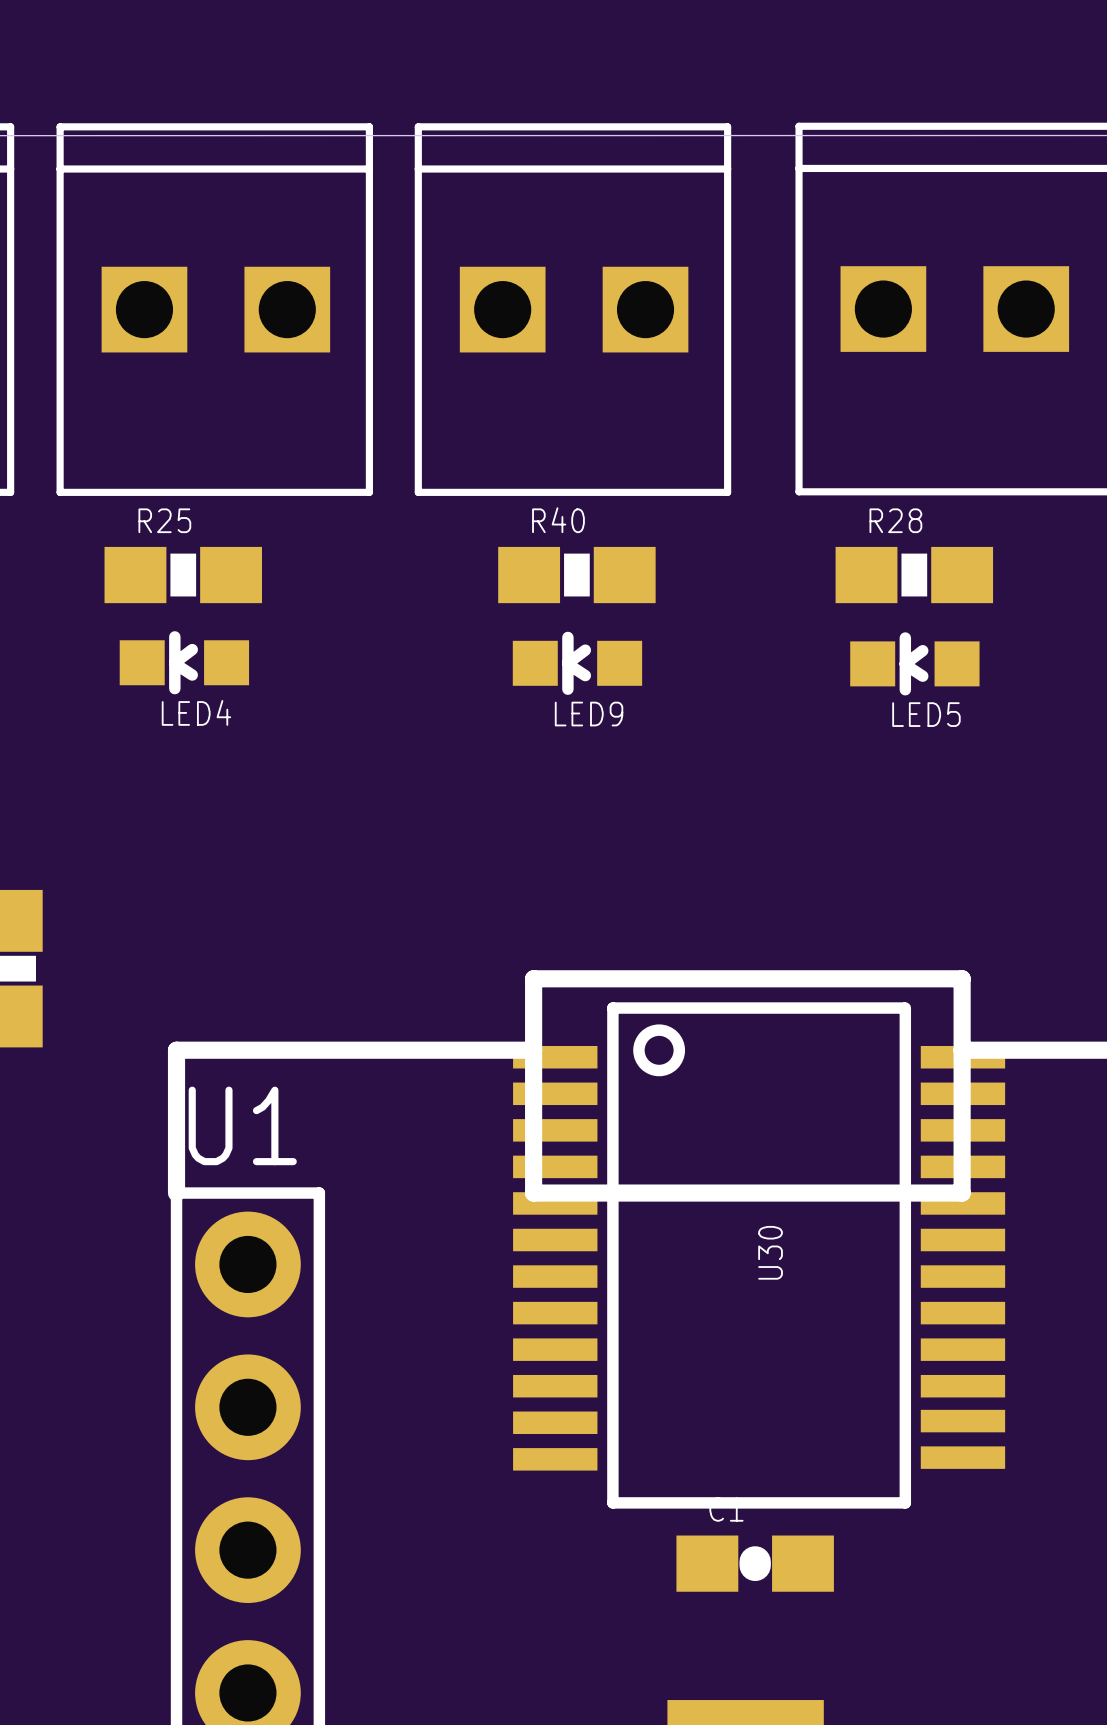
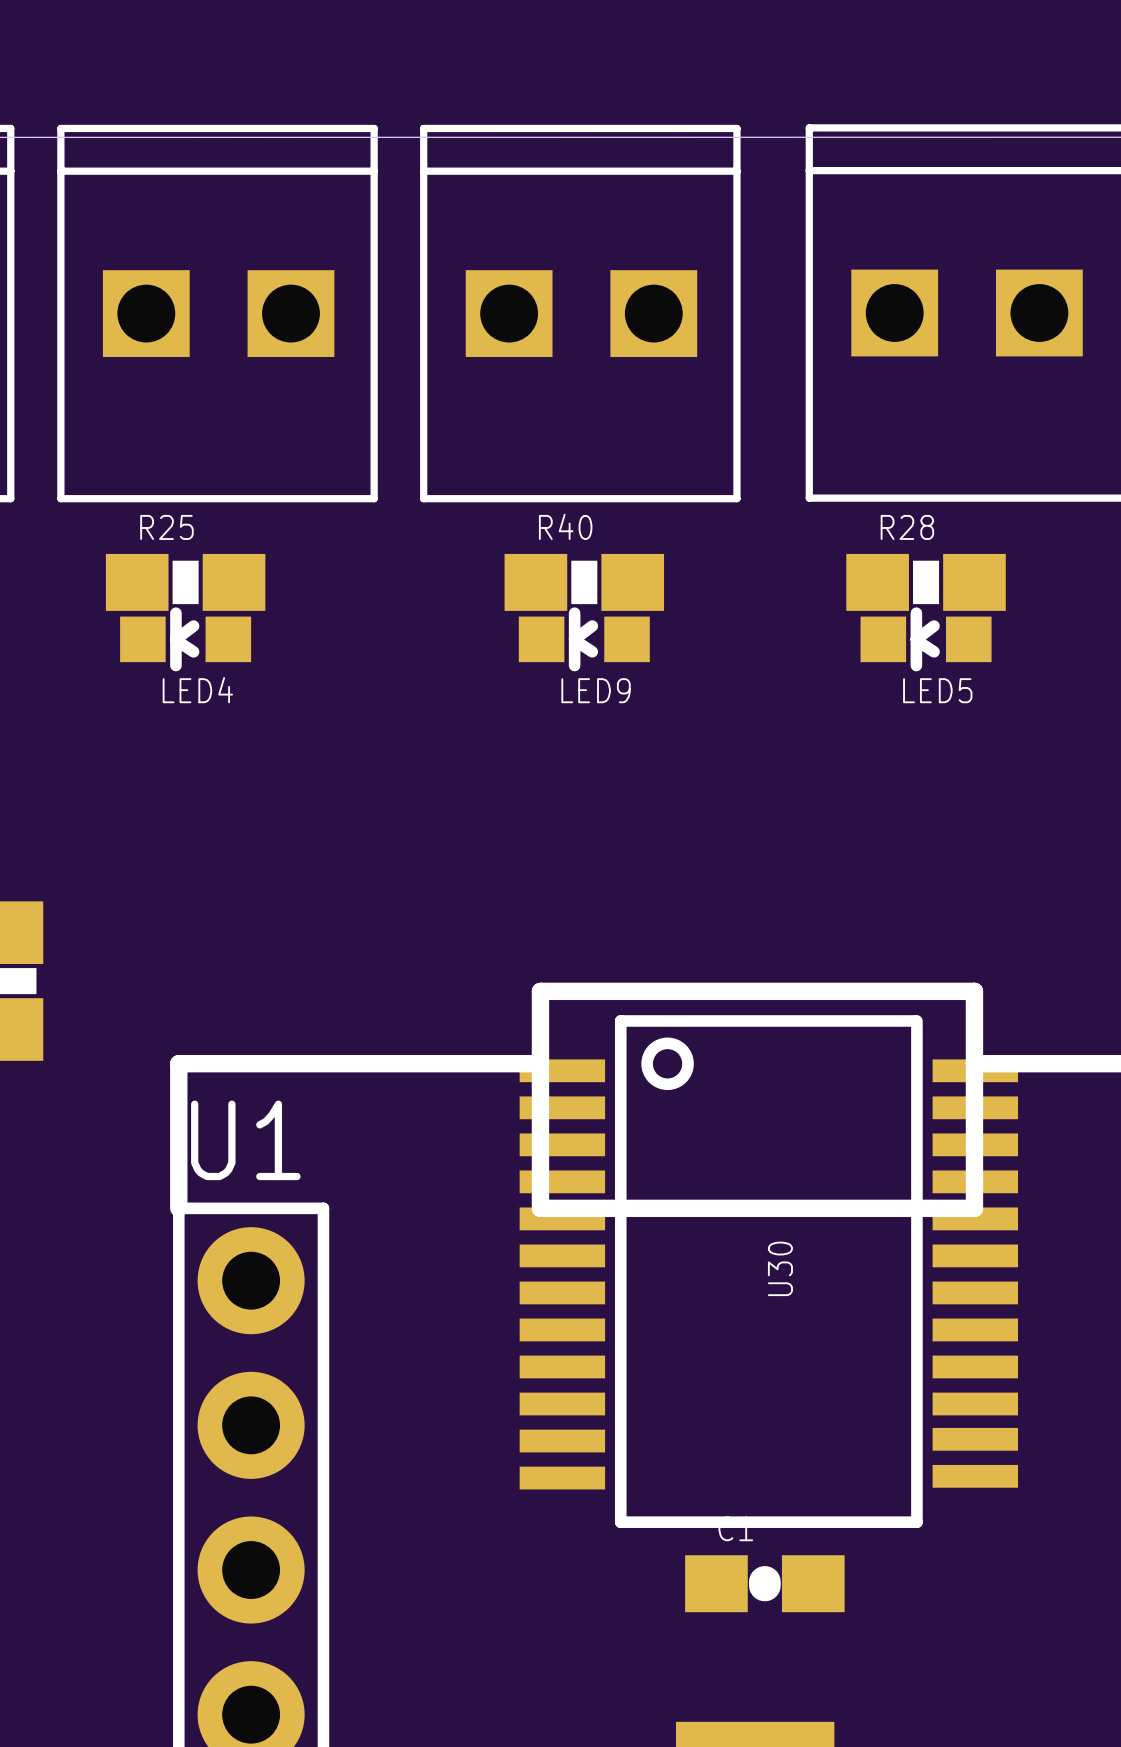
LED4 position: (184, 662) -> (185, 639)
LED9 position: (577, 663) -> (584, 639)
LED5 position: (914, 663) -> (926, 639)

